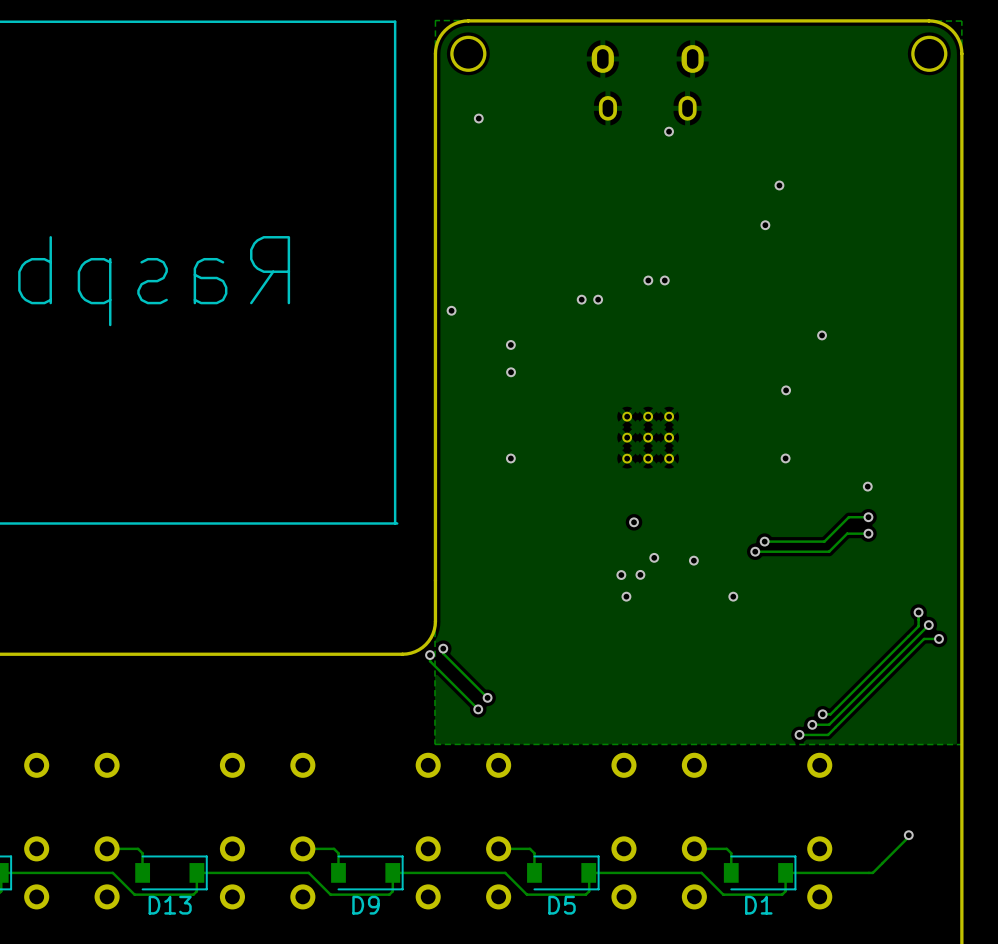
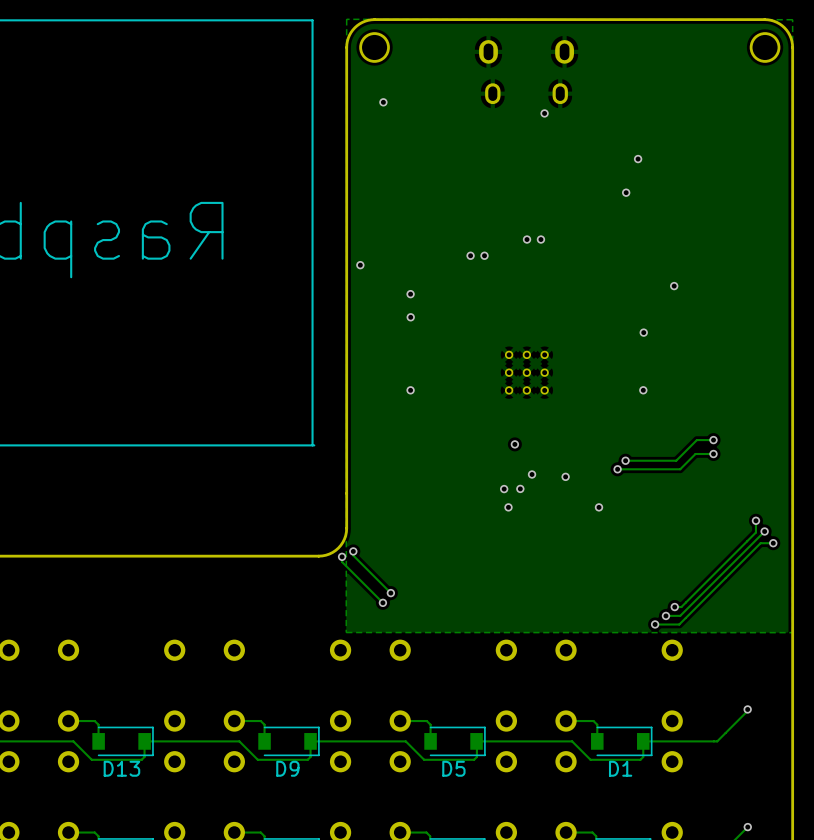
via: (867, 486) -> none

